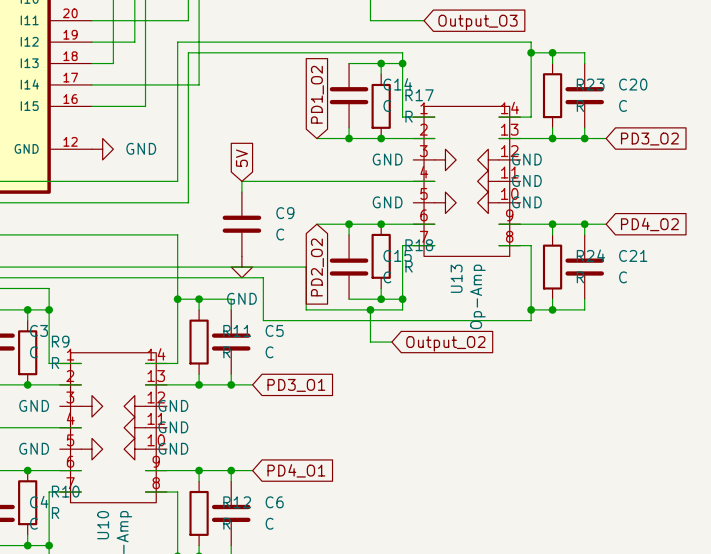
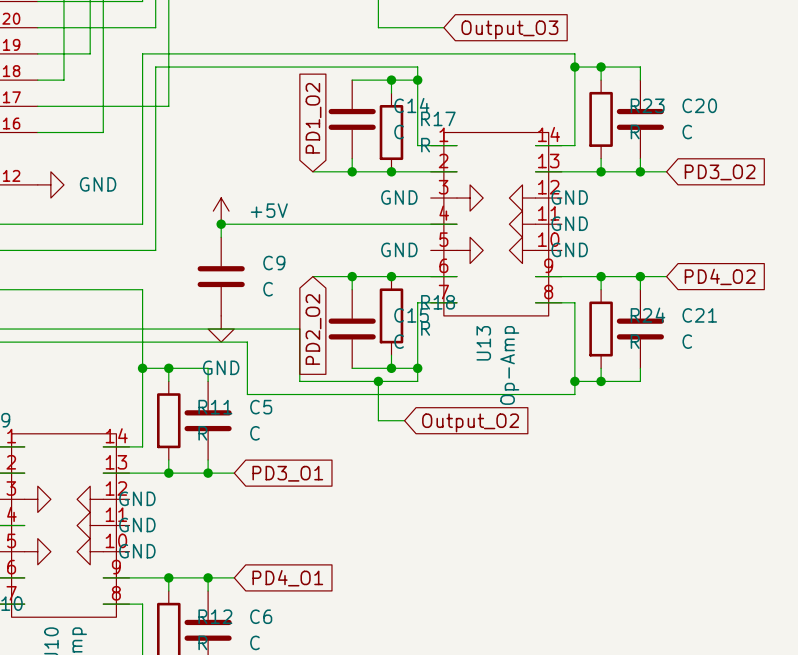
global label: 5V (241, 158) -> none
power symbol: none -> +5V (221, 211)
junction: none -> (221, 224)

